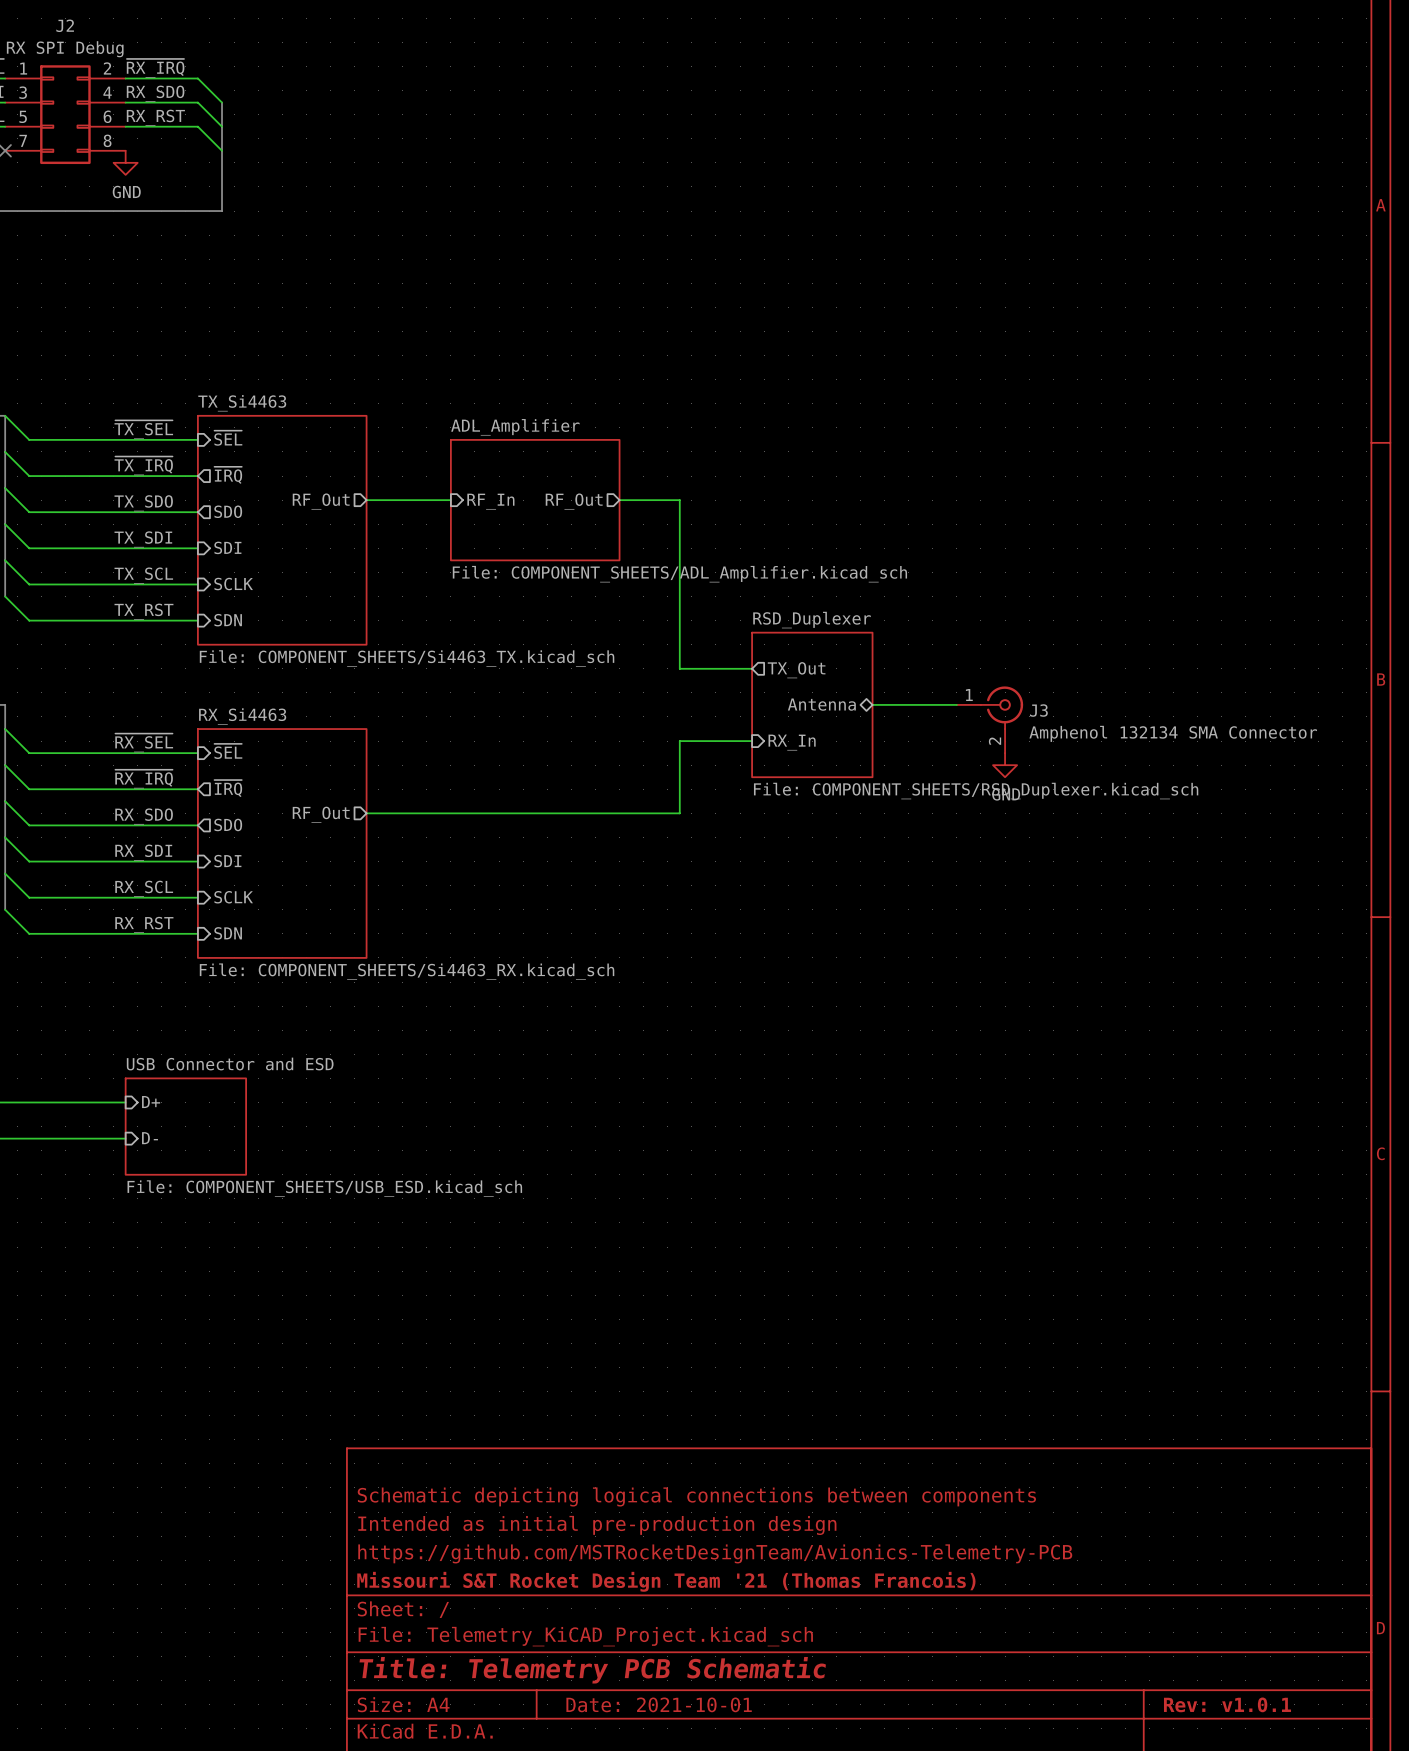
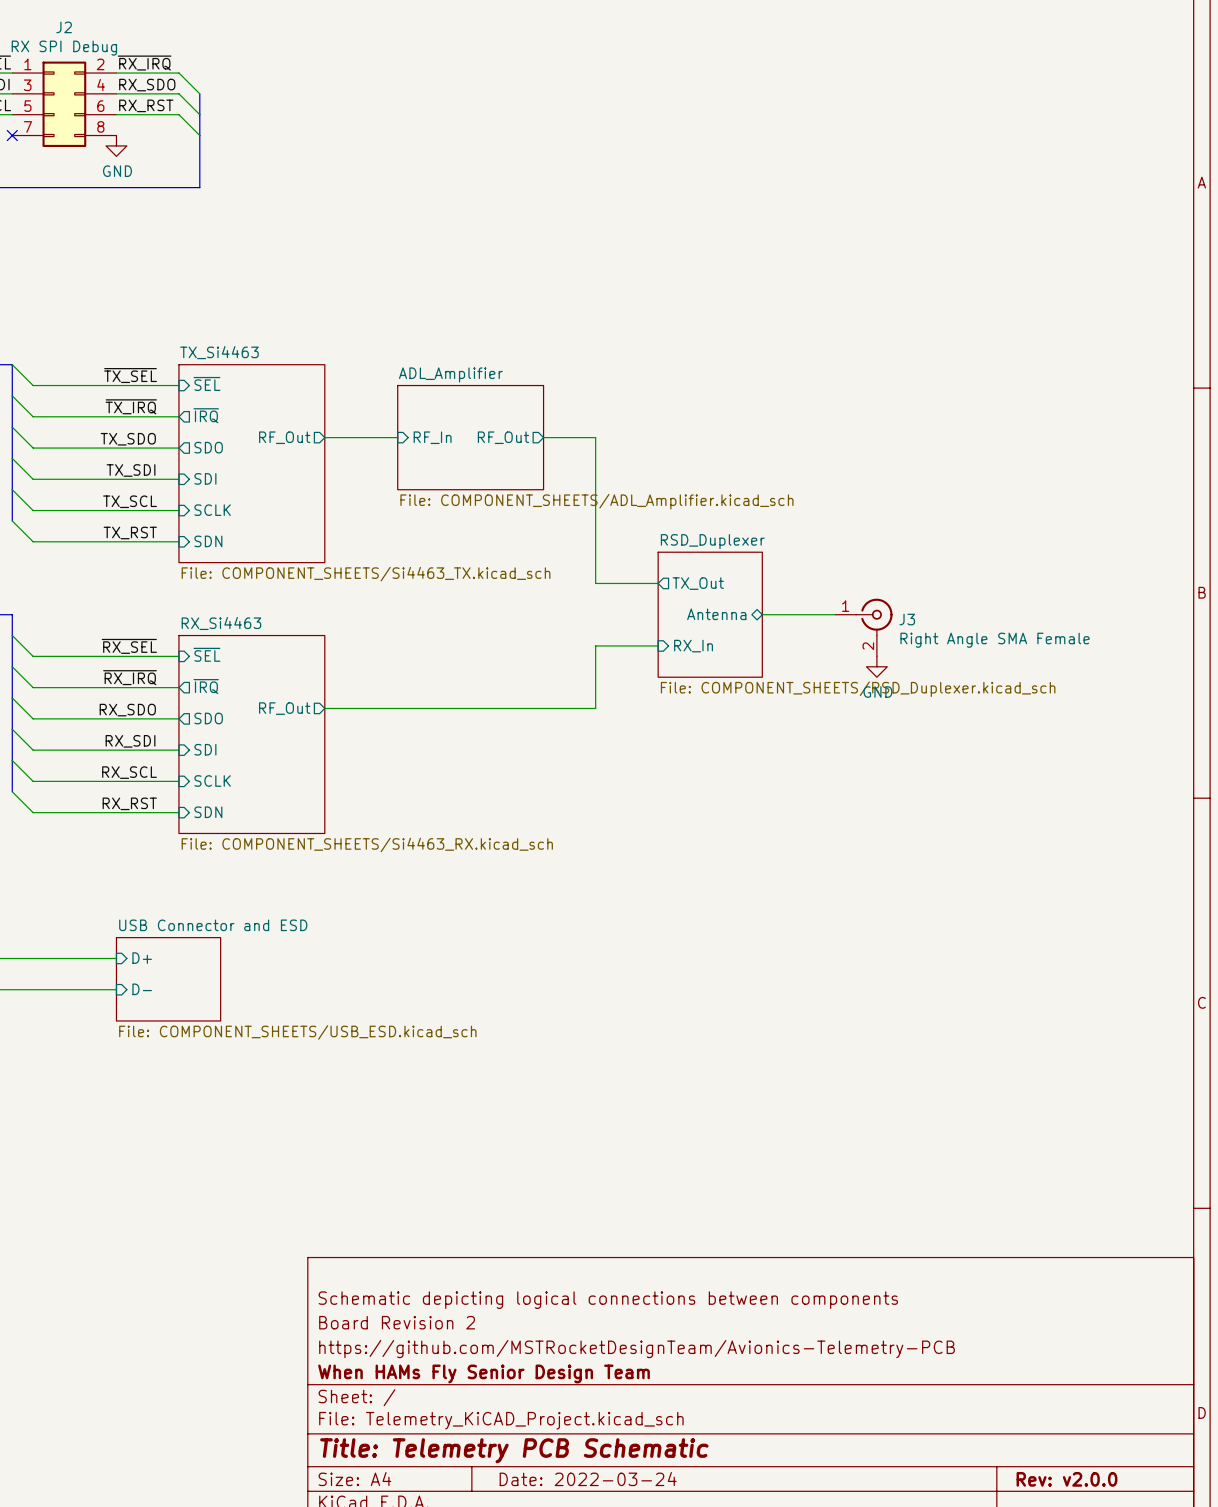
J3 value: Amphenol 132134 SMA Connector (1173, 733) -> Right Angle SMA Female (995, 640)
title block: Intended as initial pre-production design (597, 1525) -> Board Revision 2 (397, 1322)
title block: Missouri S&T Rocket Design Team '21 (Thomas Francois) (666, 1581) -> When HAMs Fly Senior Design Team (484, 1373)
title block: Date: 2021-10-01 (659, 1704) -> Date: 2022-03-24 (588, 1479)
title block: Rev: v1.0.1 (1227, 1704) -> Rev: v2.0.0 (1066, 1479)

